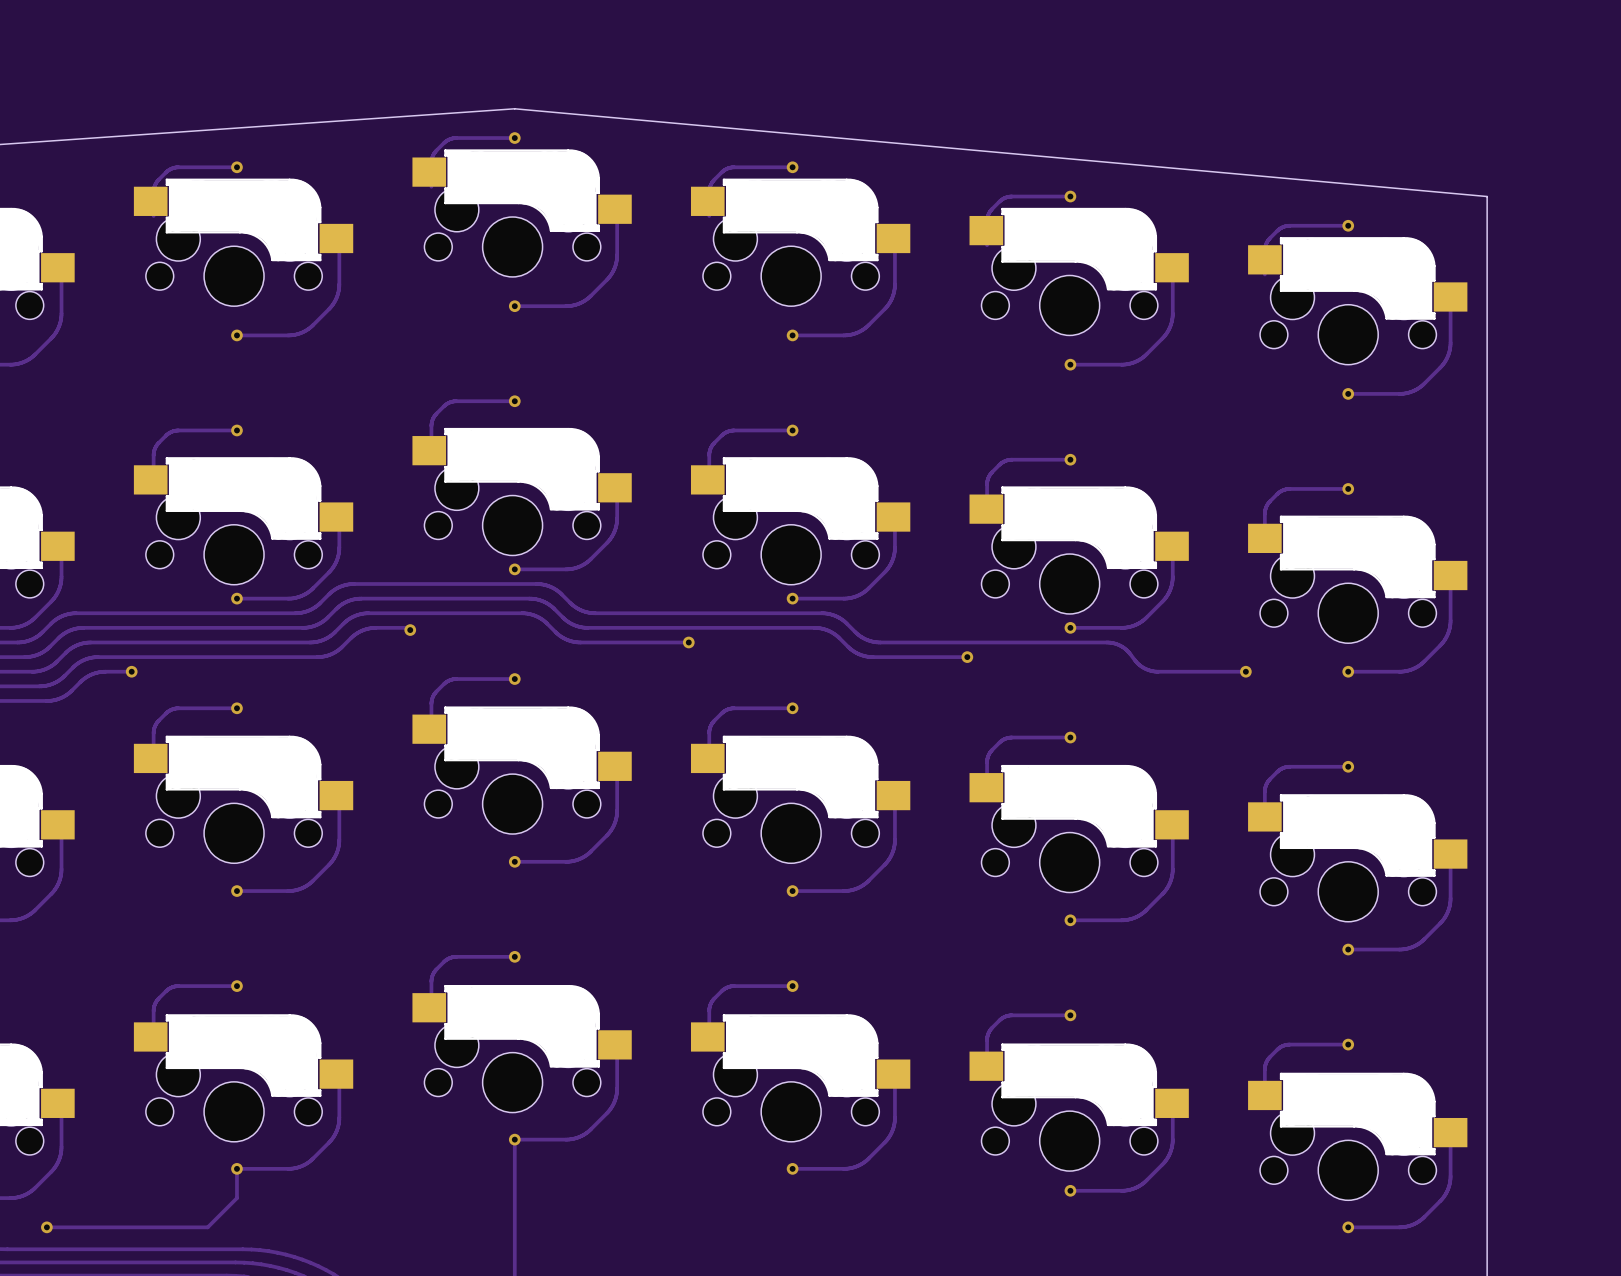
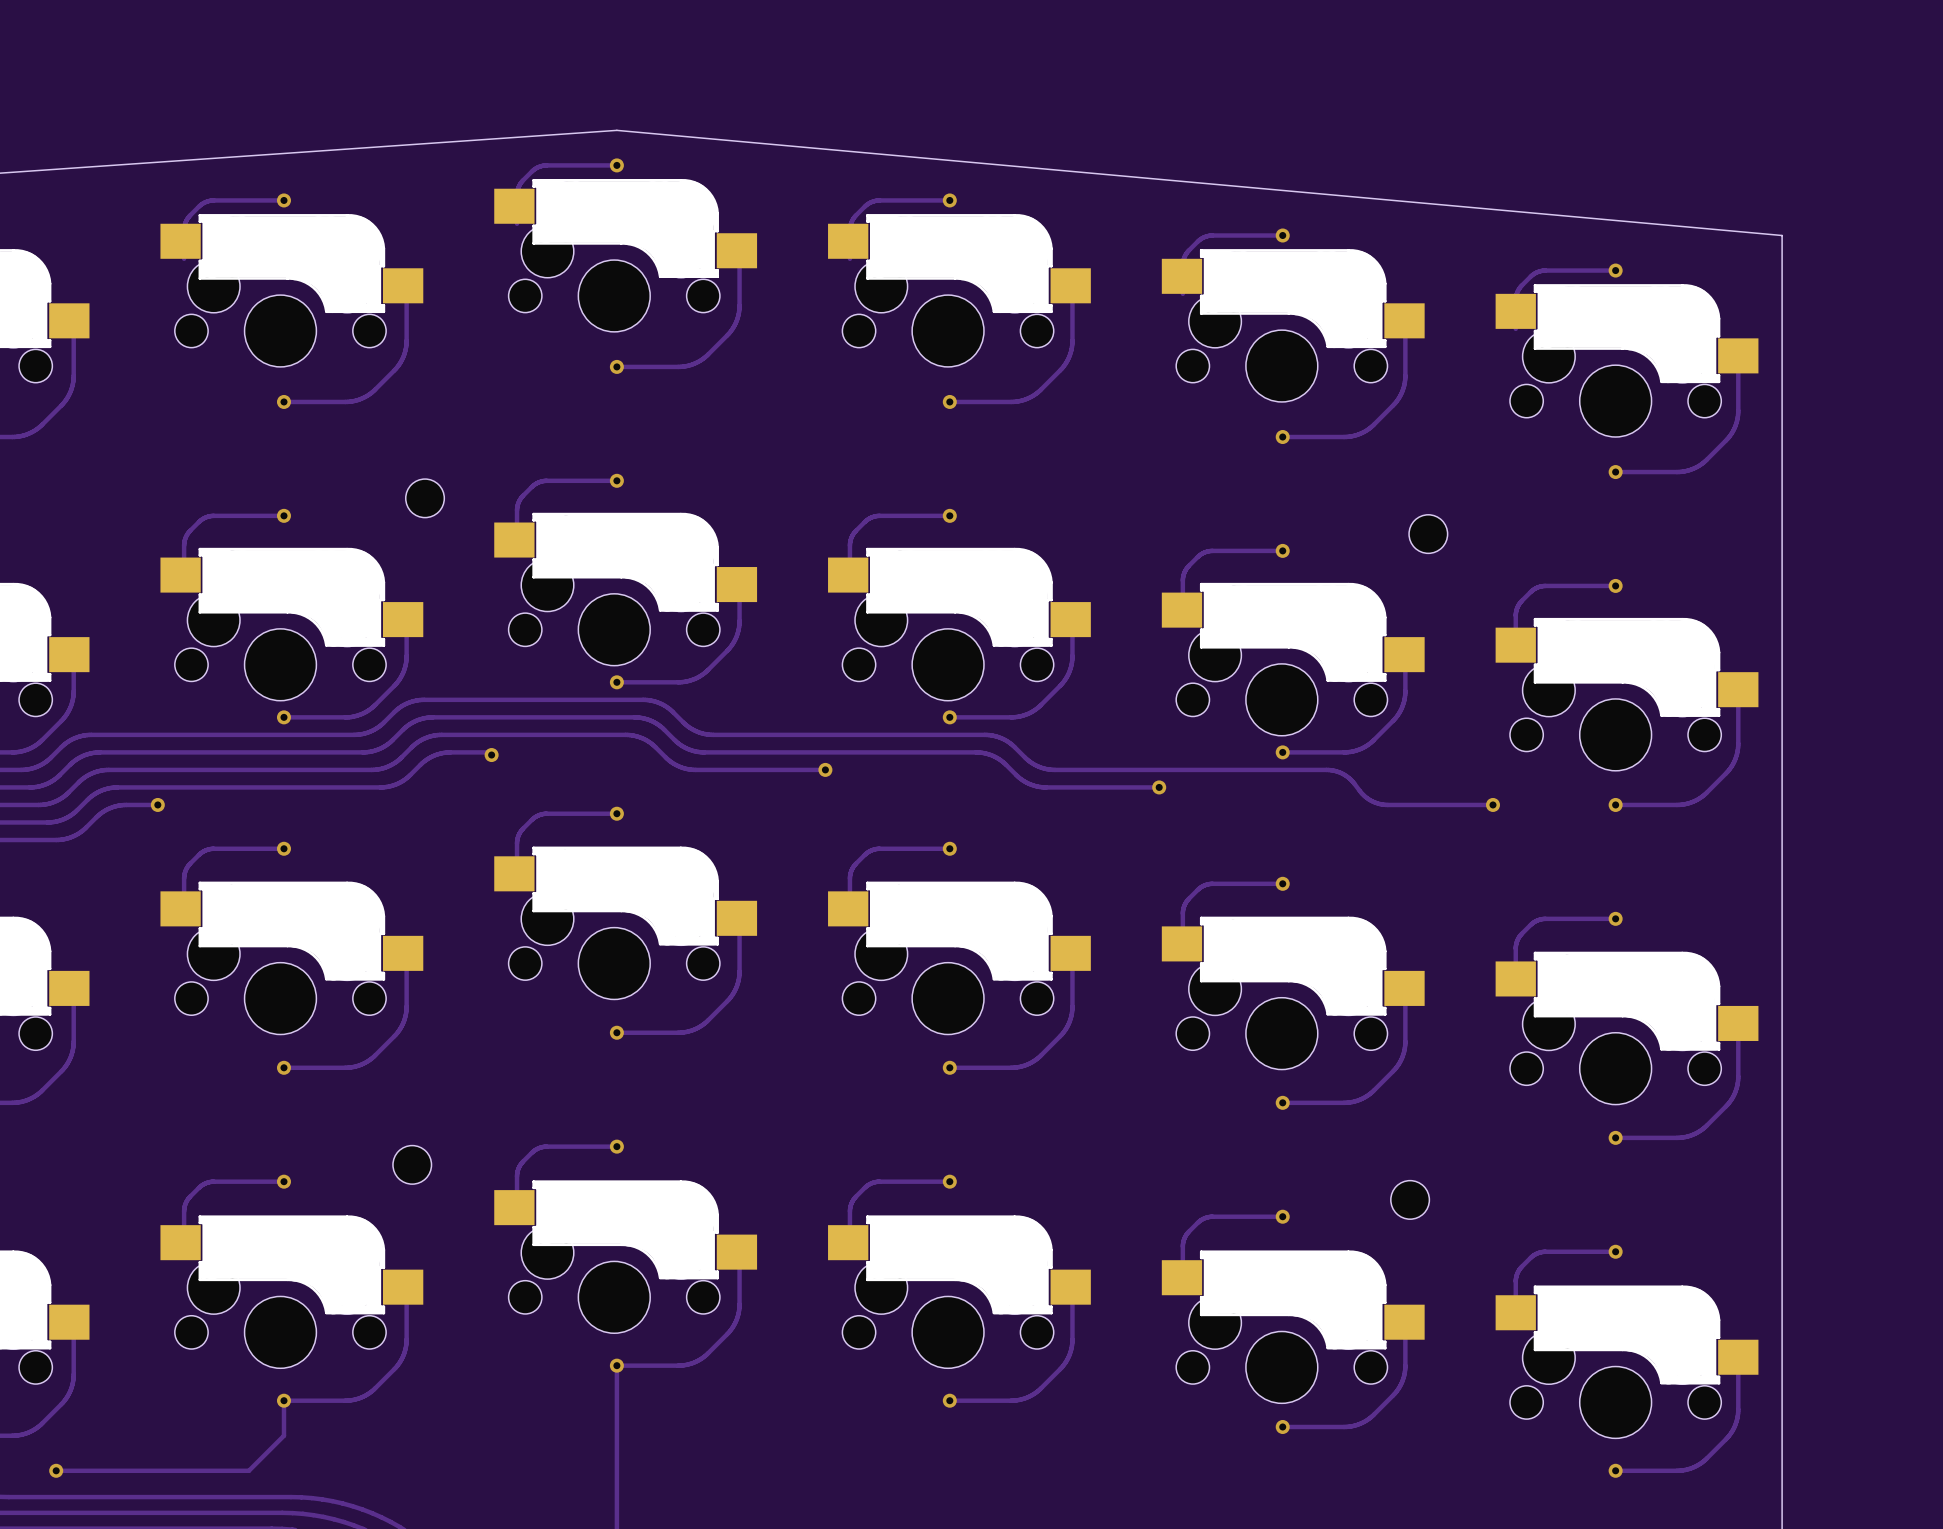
part: none -> (425, 498)
part: none -> (1428, 534)
part: none -> (412, 1164)
part: none -> (1410, 1199)

